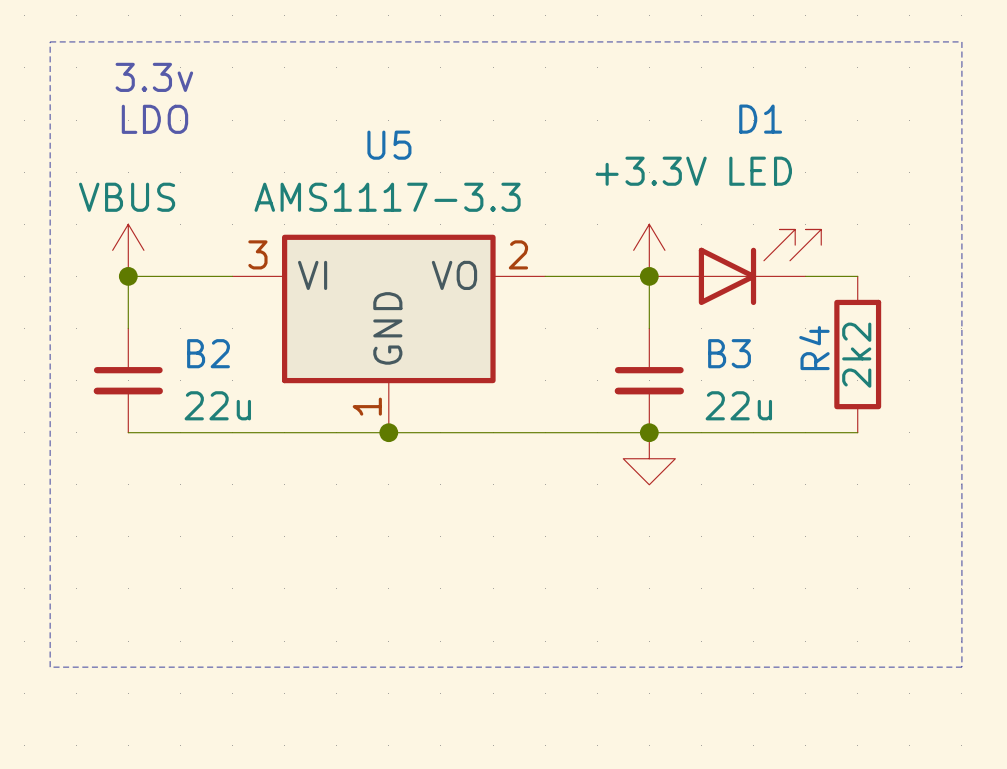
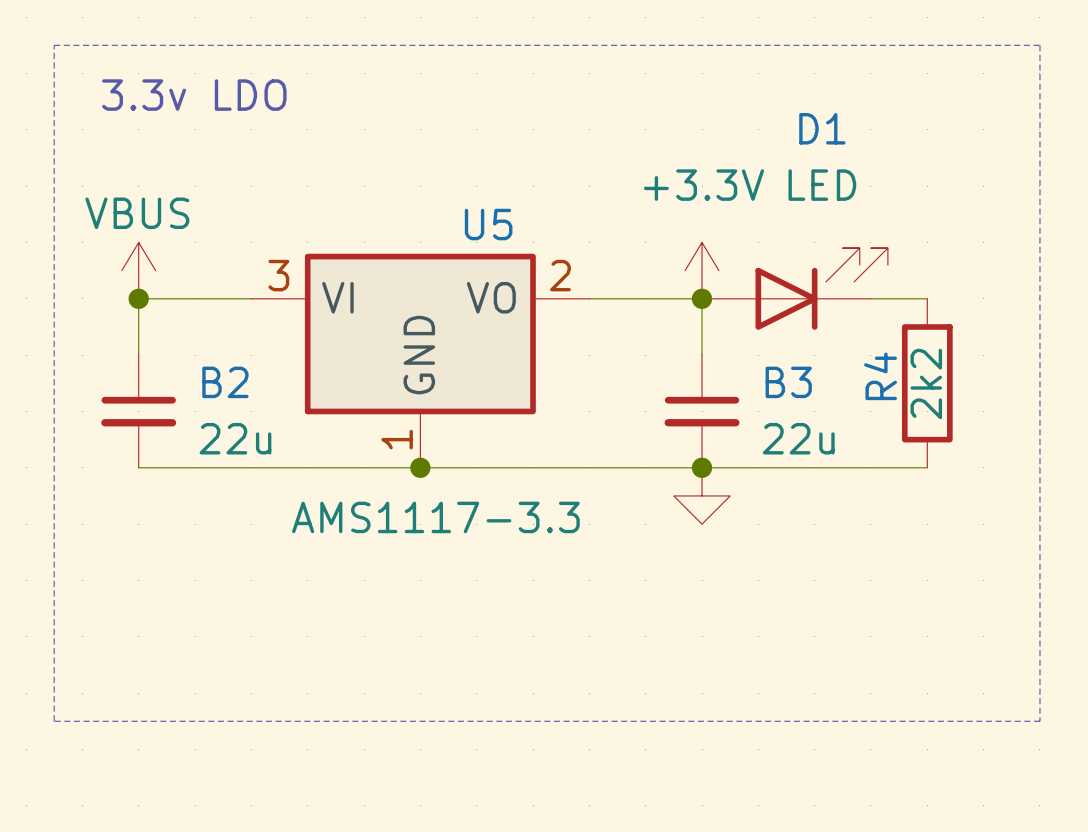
text: 3.3v (154, 77) -> 3.3v LDO (194, 95)
text: LDO (154, 119) -> none
U5 name position: U5 (389, 145) -> U5 (488, 224)
U5 value position: AMS1117-3.3 (387, 197) -> AMS1117-3.3 (435, 517)

